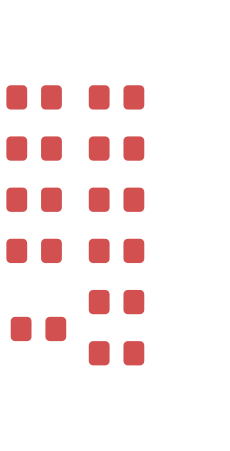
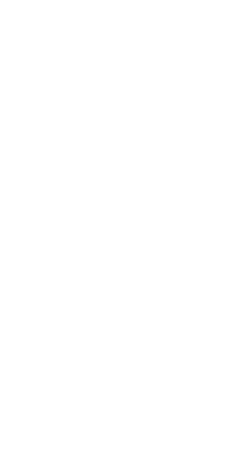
part: (34, 97) -> none
part: (116, 97) -> none
part: (34, 148) -> none
part: (116, 148) -> none
part: (34, 199) -> none
part: (116, 199) -> none
part: (34, 250) -> none
part: (116, 250) -> none
part: (116, 302) -> none
part: (38, 328) -> none
part: (116, 353) -> none

